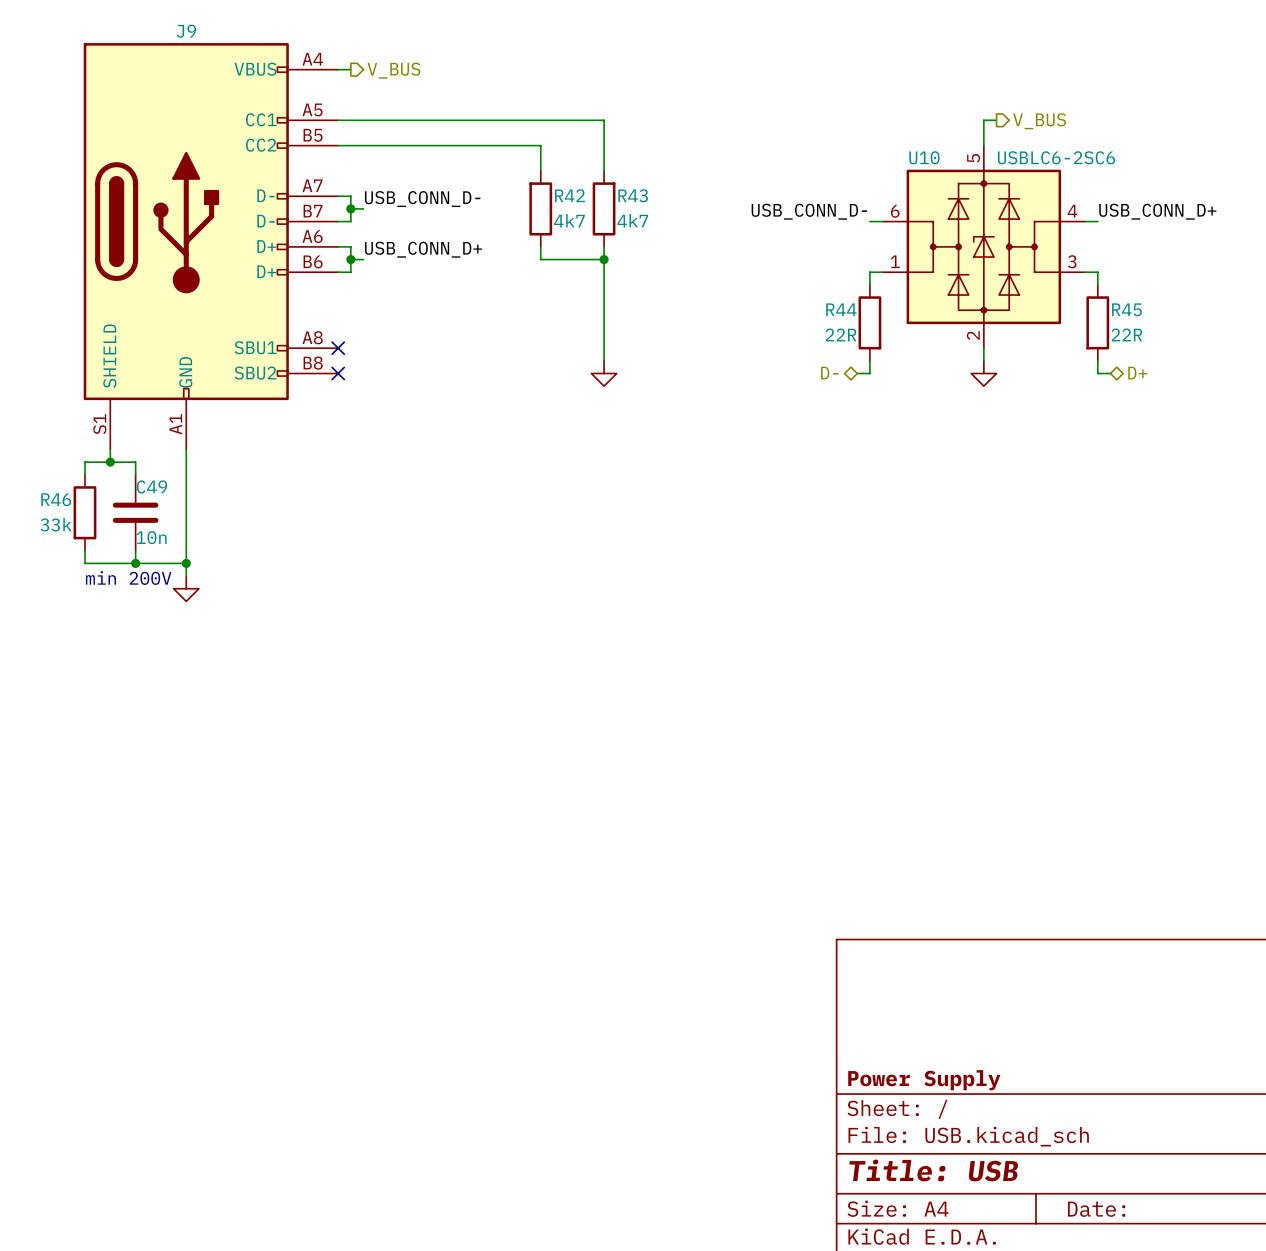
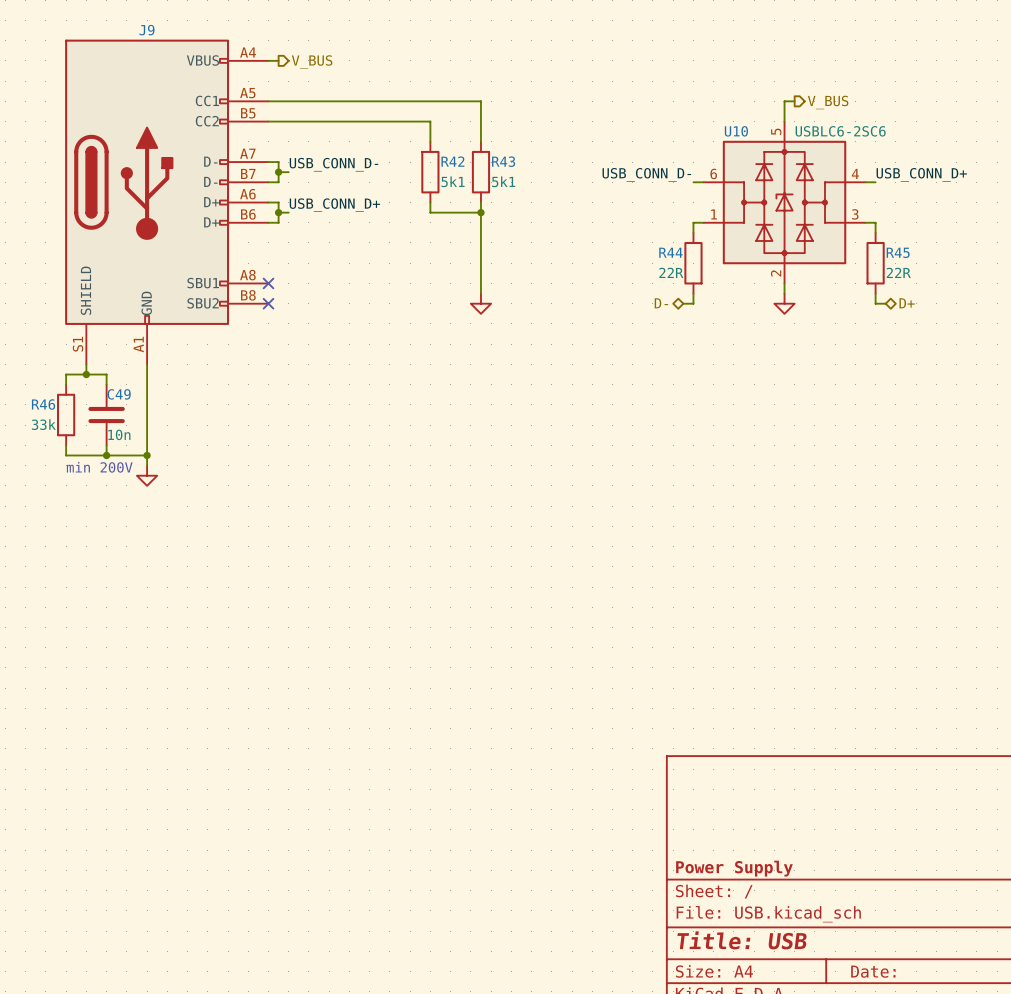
R42 value: 4k7 (569, 220) -> 5k1 (453, 181)
R43 value: 4k7 (632, 220) -> 5k1 (503, 181)

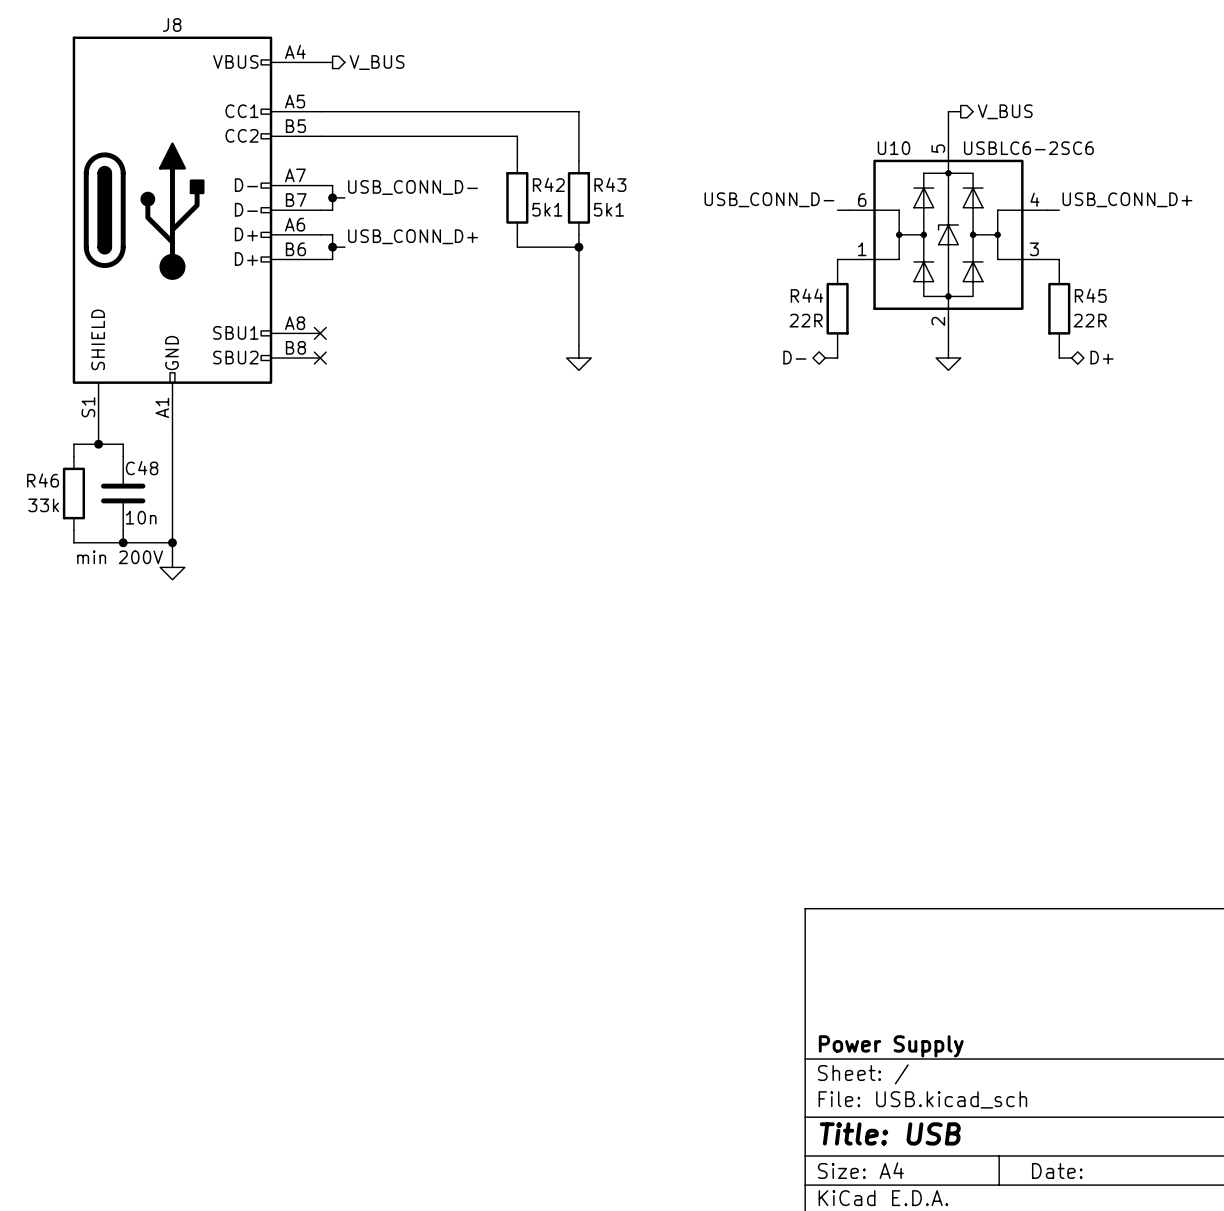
J9 name: J9 (146, 30) -> J8 (172, 25)
C49 name: C49 (119, 394) -> C48 (142, 468)

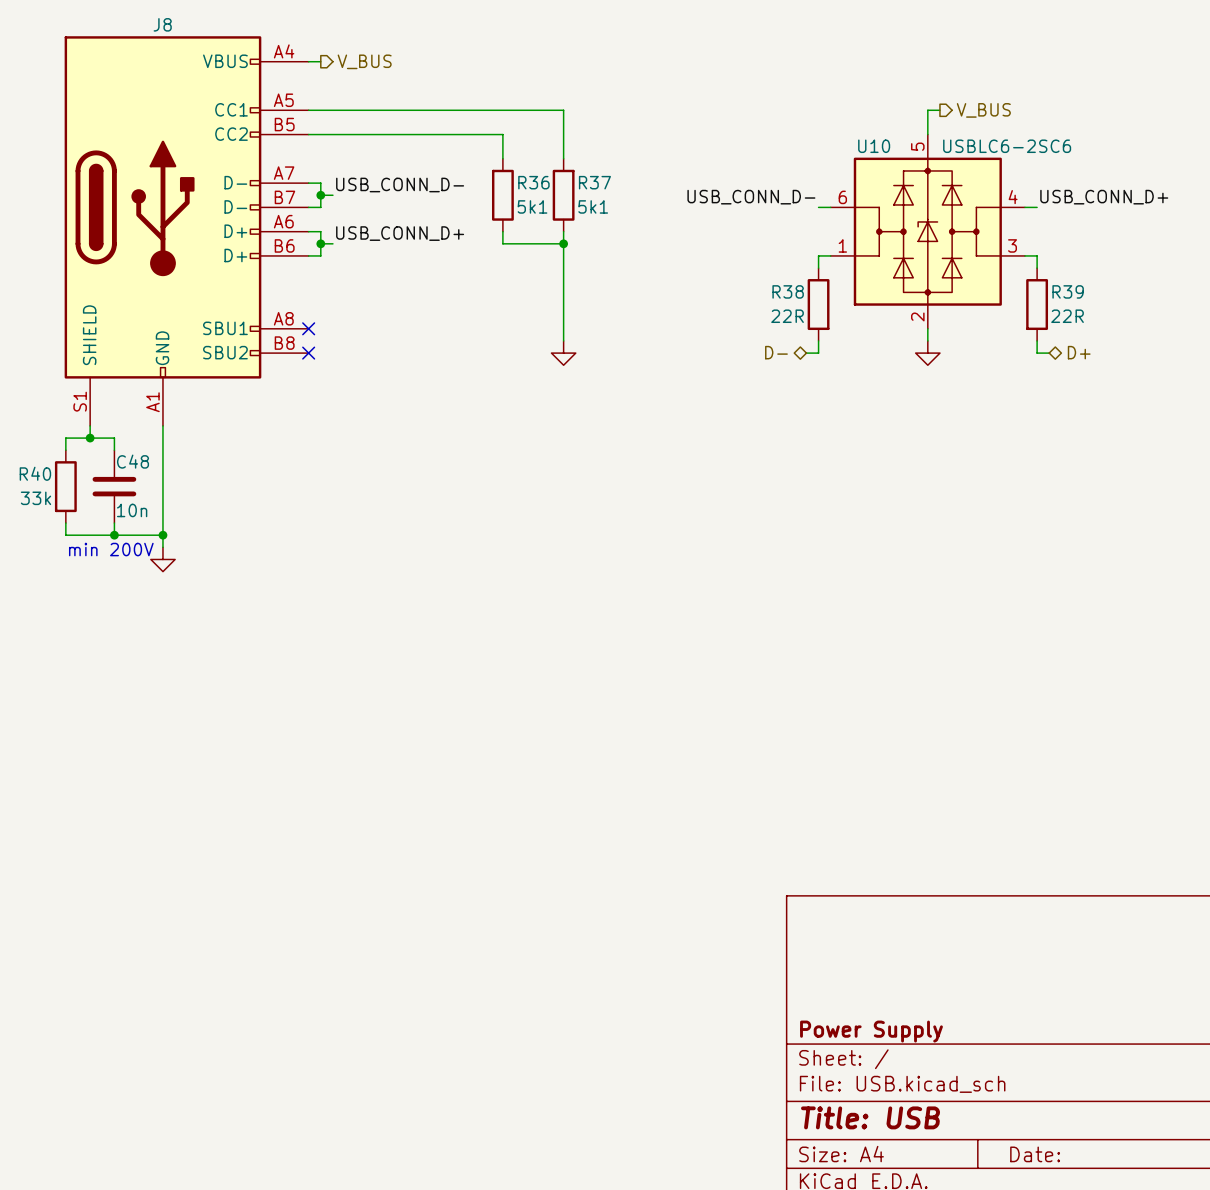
R42 name: R42 (548, 184) -> R36 (533, 182)
R43 name: R43 (610, 184) -> R37 (594, 182)
R44 name: R44 (806, 295) -> R38 (788, 291)
R45 name: R45 (1090, 295) -> R39 (1068, 291)
R46 name: R46 (43, 480) -> R40 (35, 473)

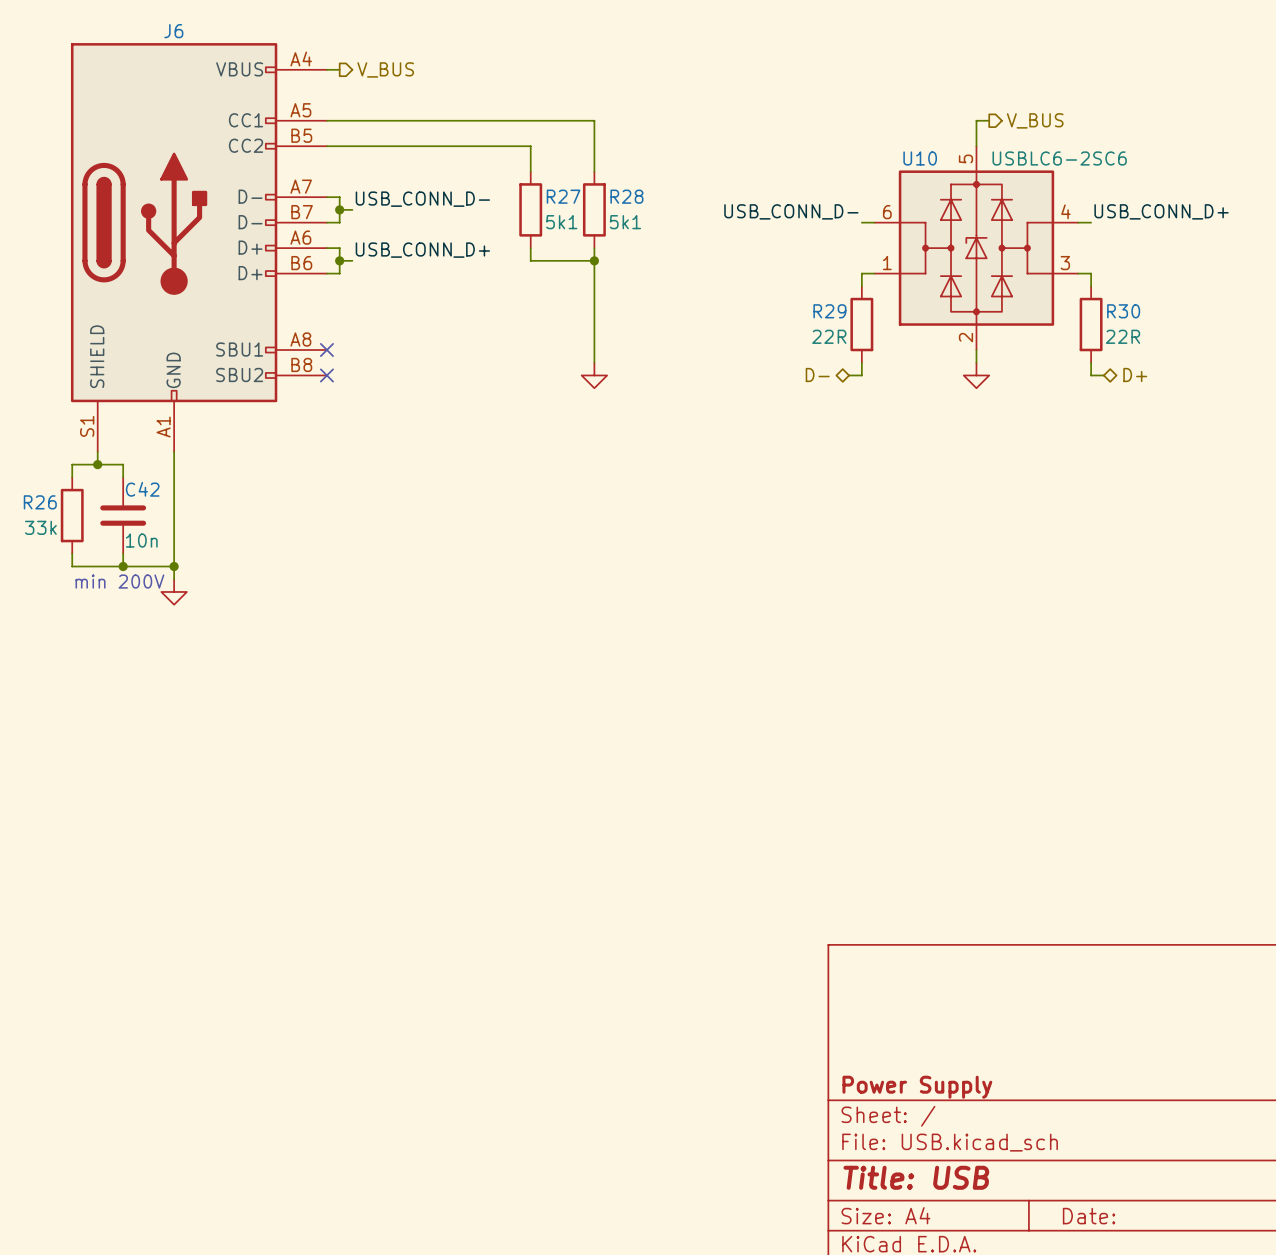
J8 name: J8 (162, 24) -> J6 (173, 31)
R36 name: R36 (533, 182) -> R27 (563, 196)
R37 name: R37 (594, 182) -> R28 (626, 196)
R38 name: R38 (788, 291) -> R29 (829, 311)
R39 name: R39 (1068, 291) -> R30 (1123, 311)
C48 name: C48 (133, 461) -> C42 (142, 489)
R40 name: R40 (35, 473) -> R26 (40, 502)

